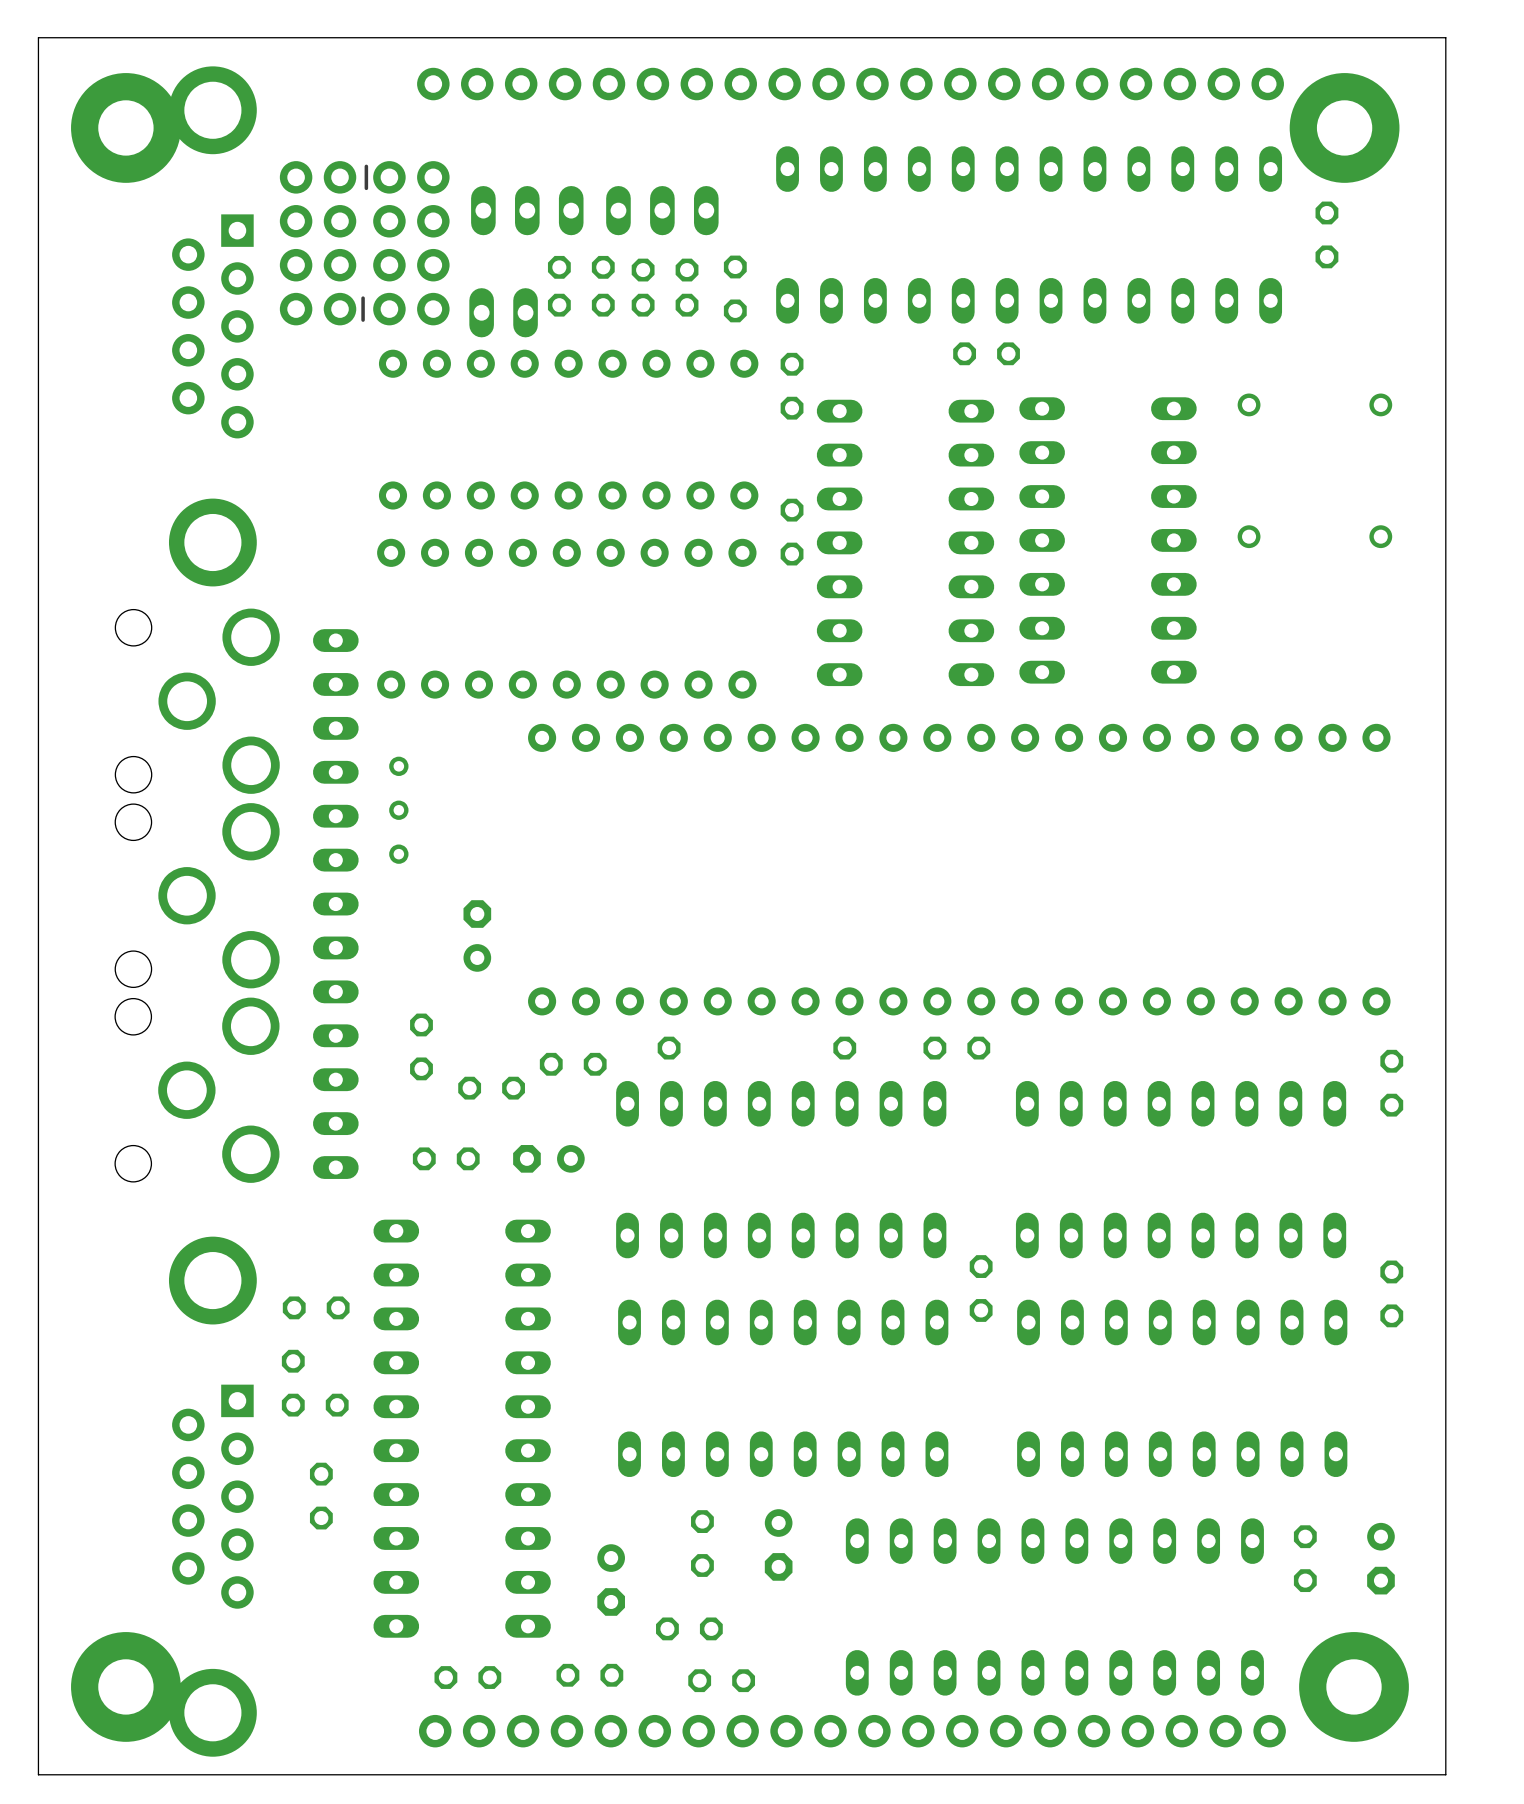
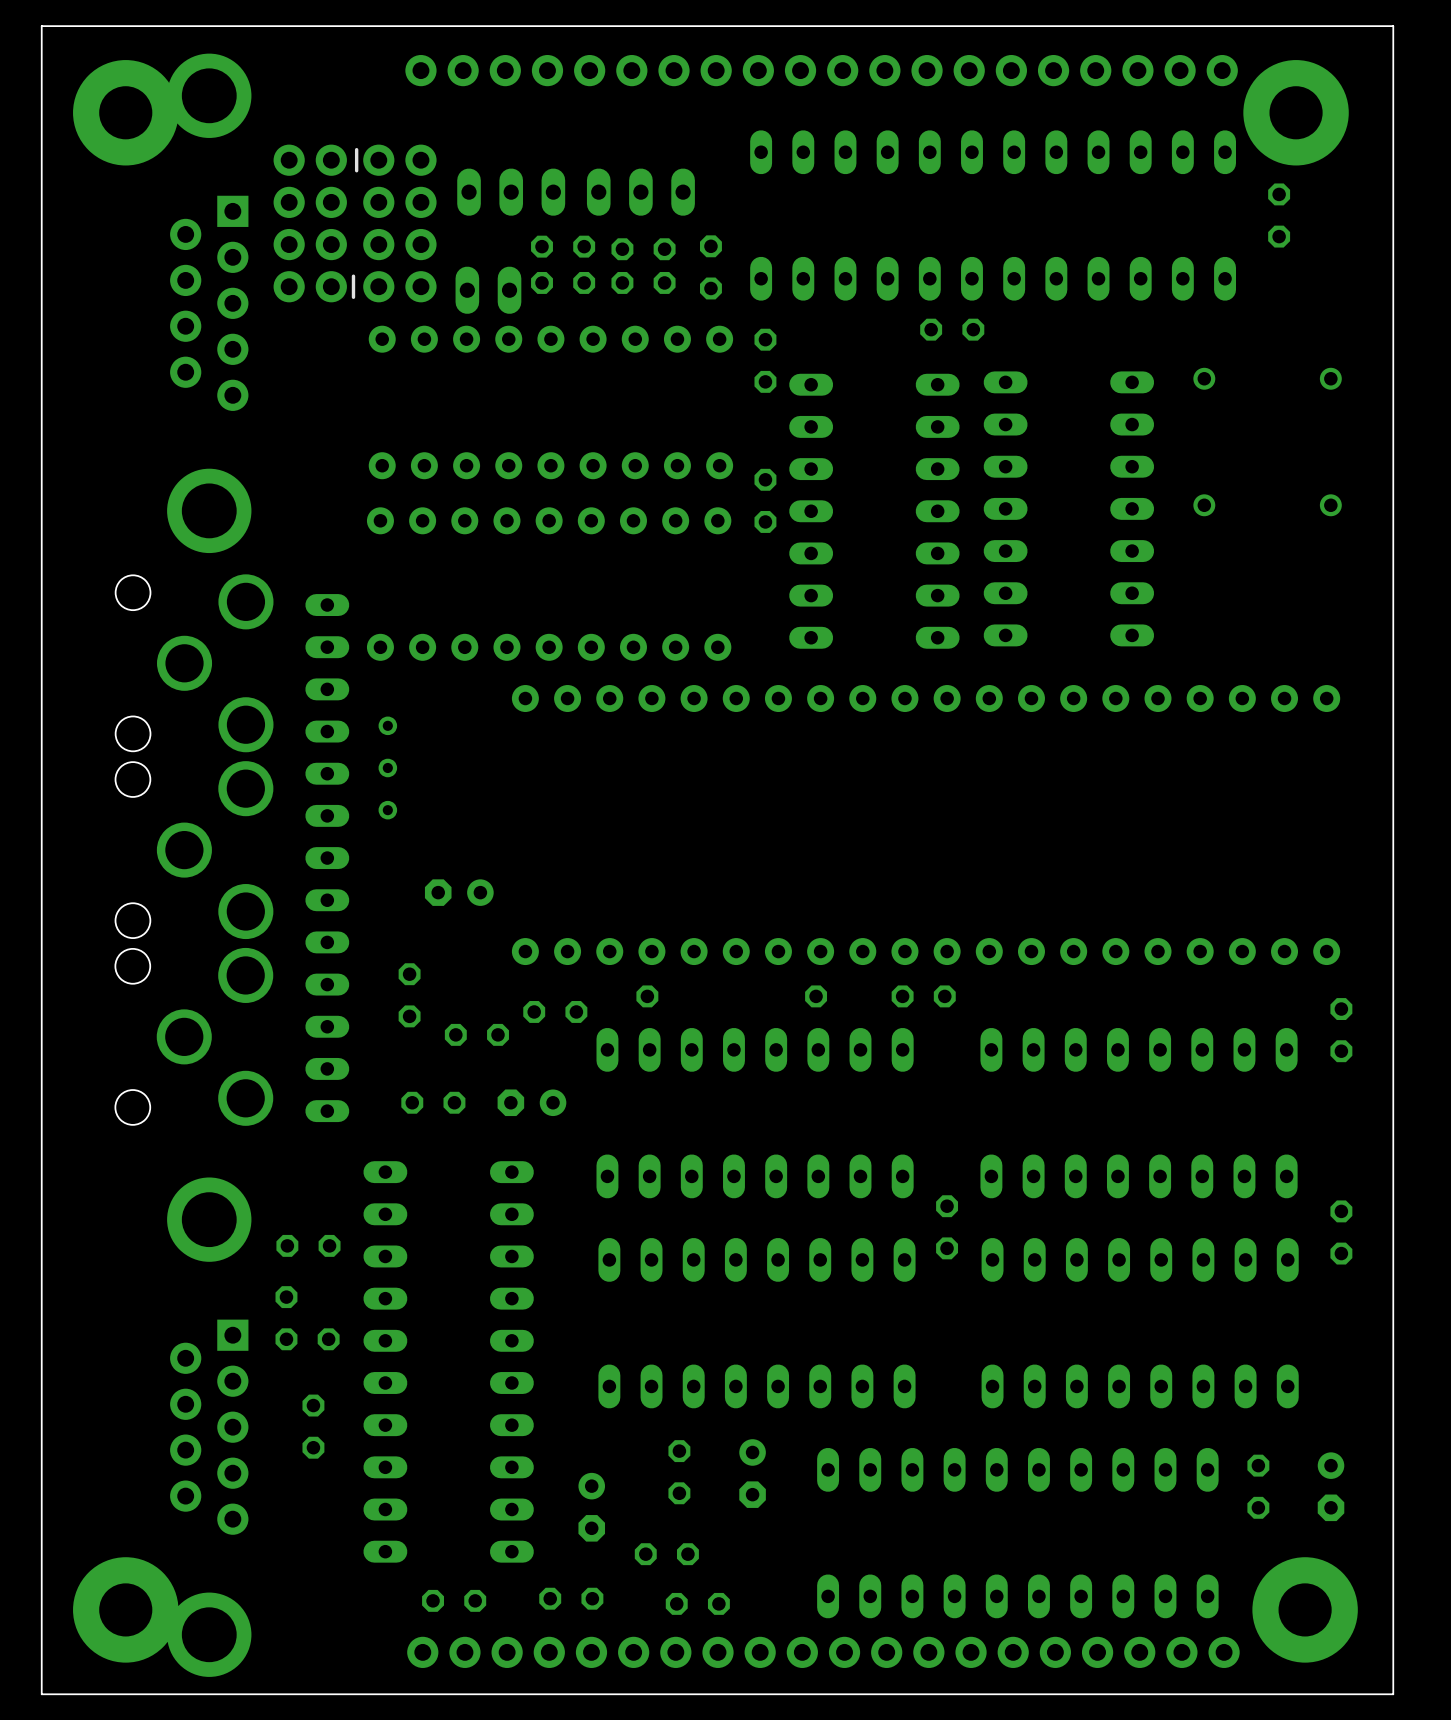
part rotation: 0° (477, 935) -> 90° counterclockwise (459, 892)

